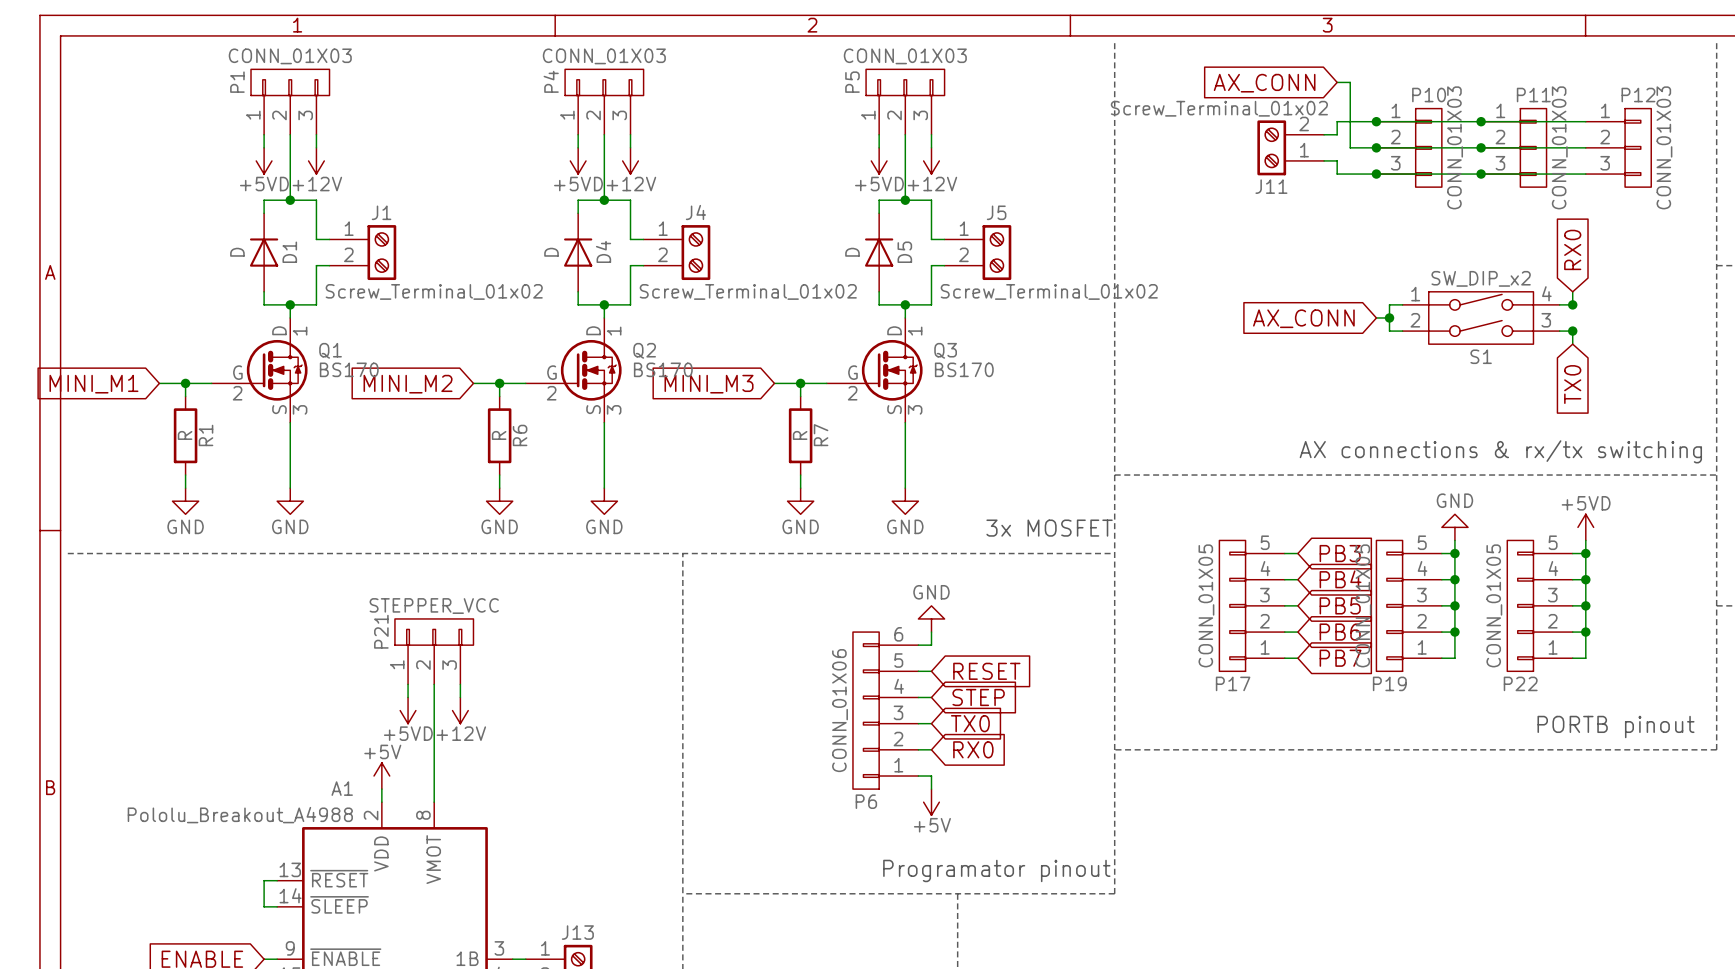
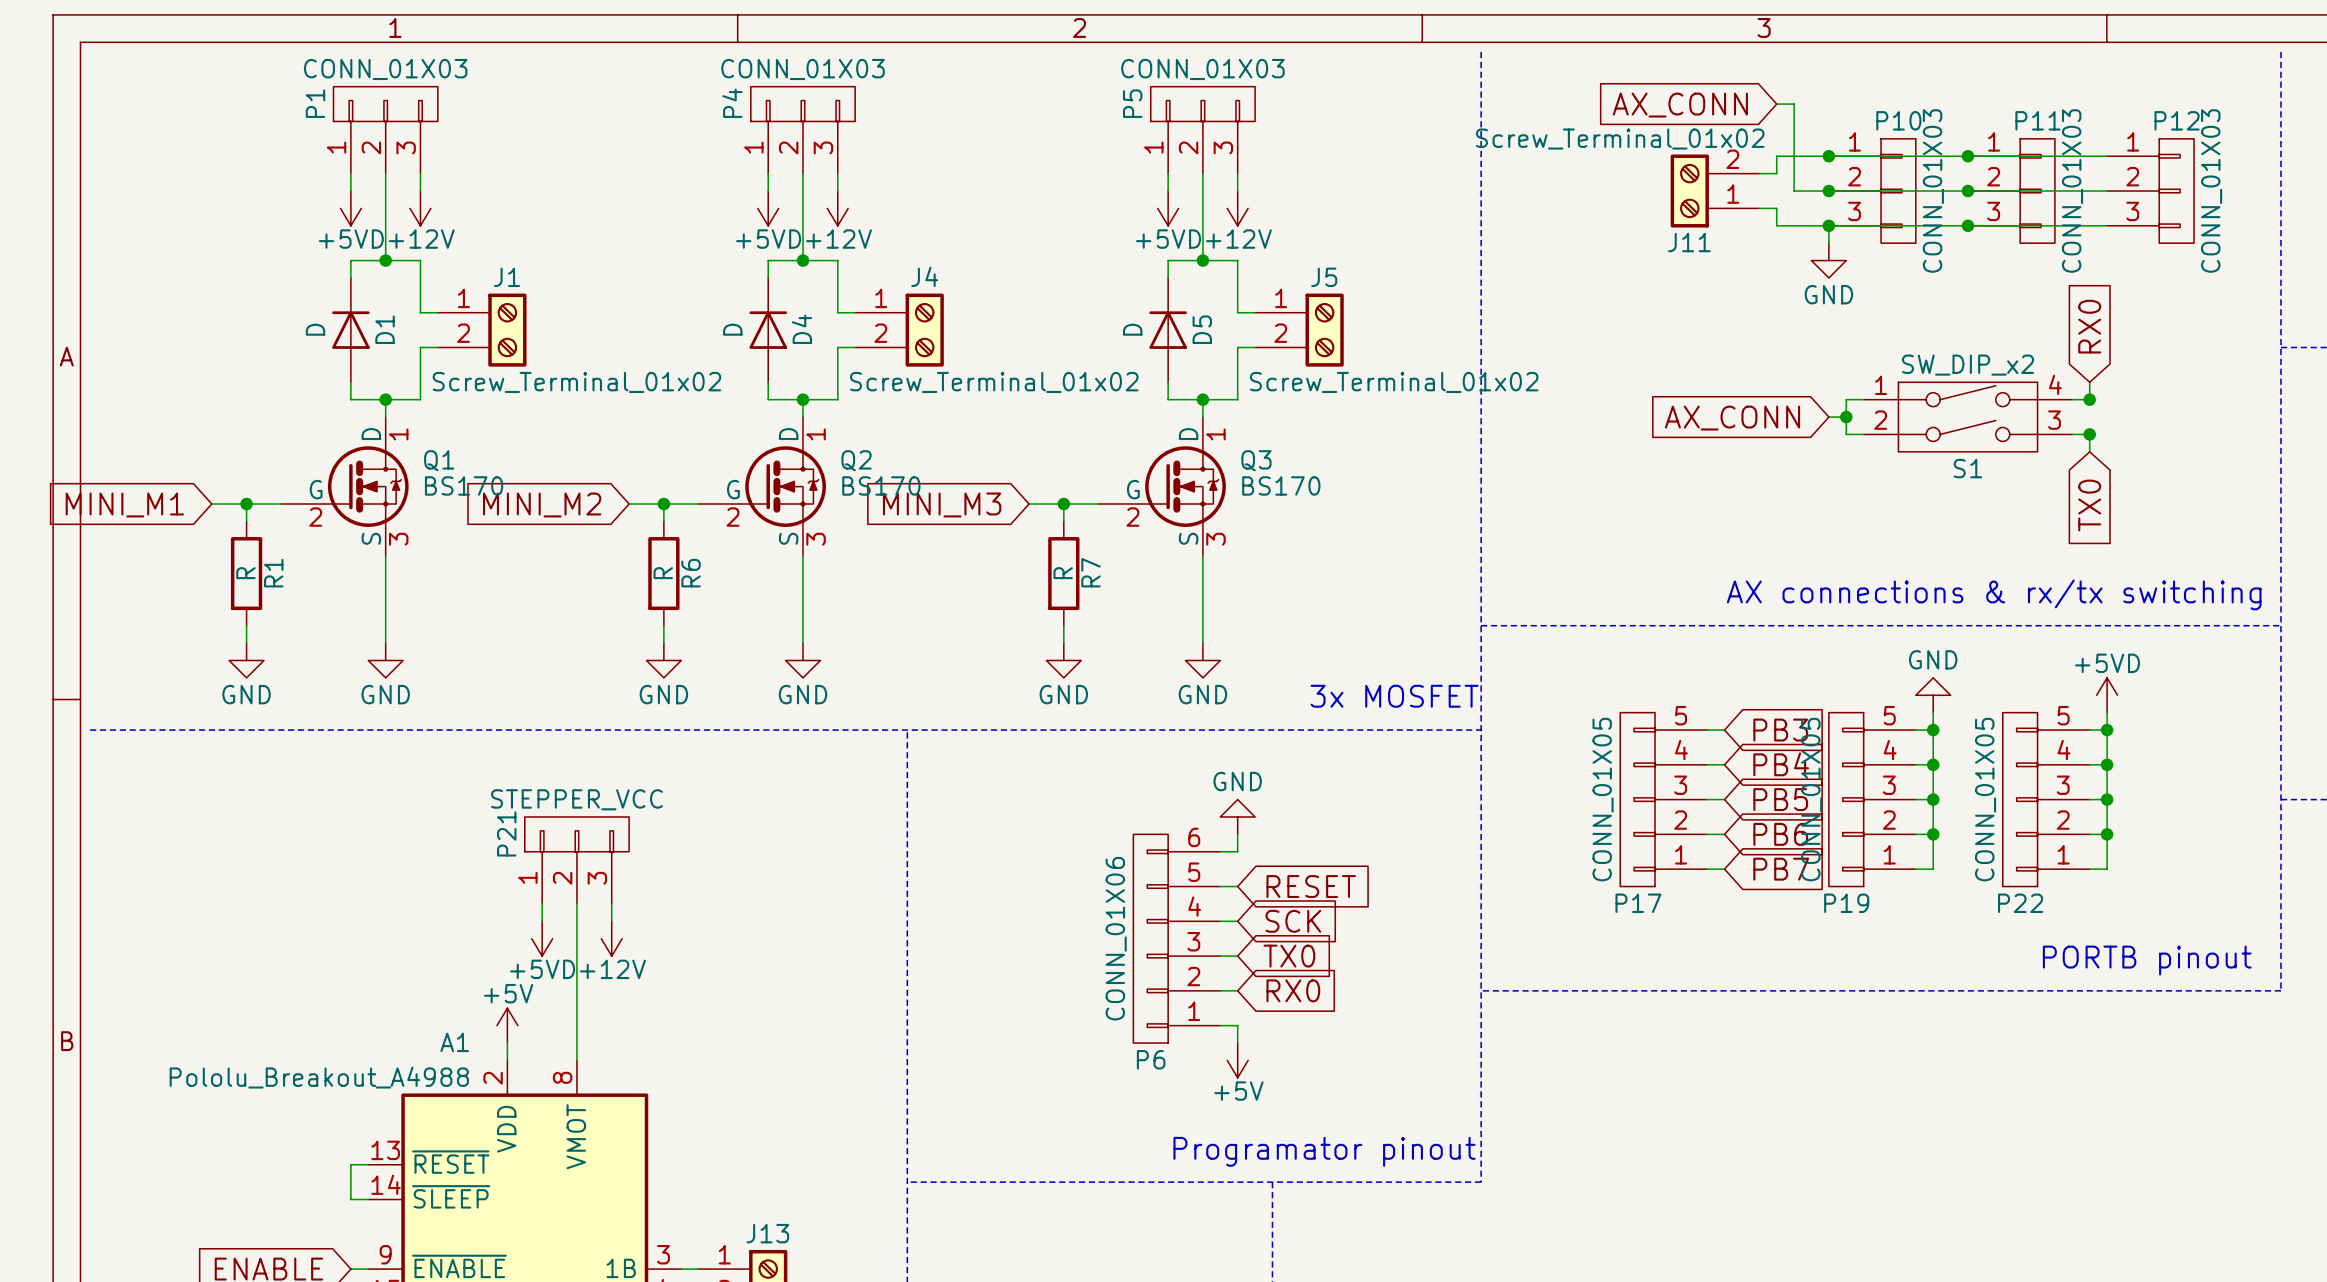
wire: none -> (1828, 225) (1828, 243)
power symbol: none -> GND (1828, 260)
global label: STEP (978, 697) -> SCK (1293, 921)

